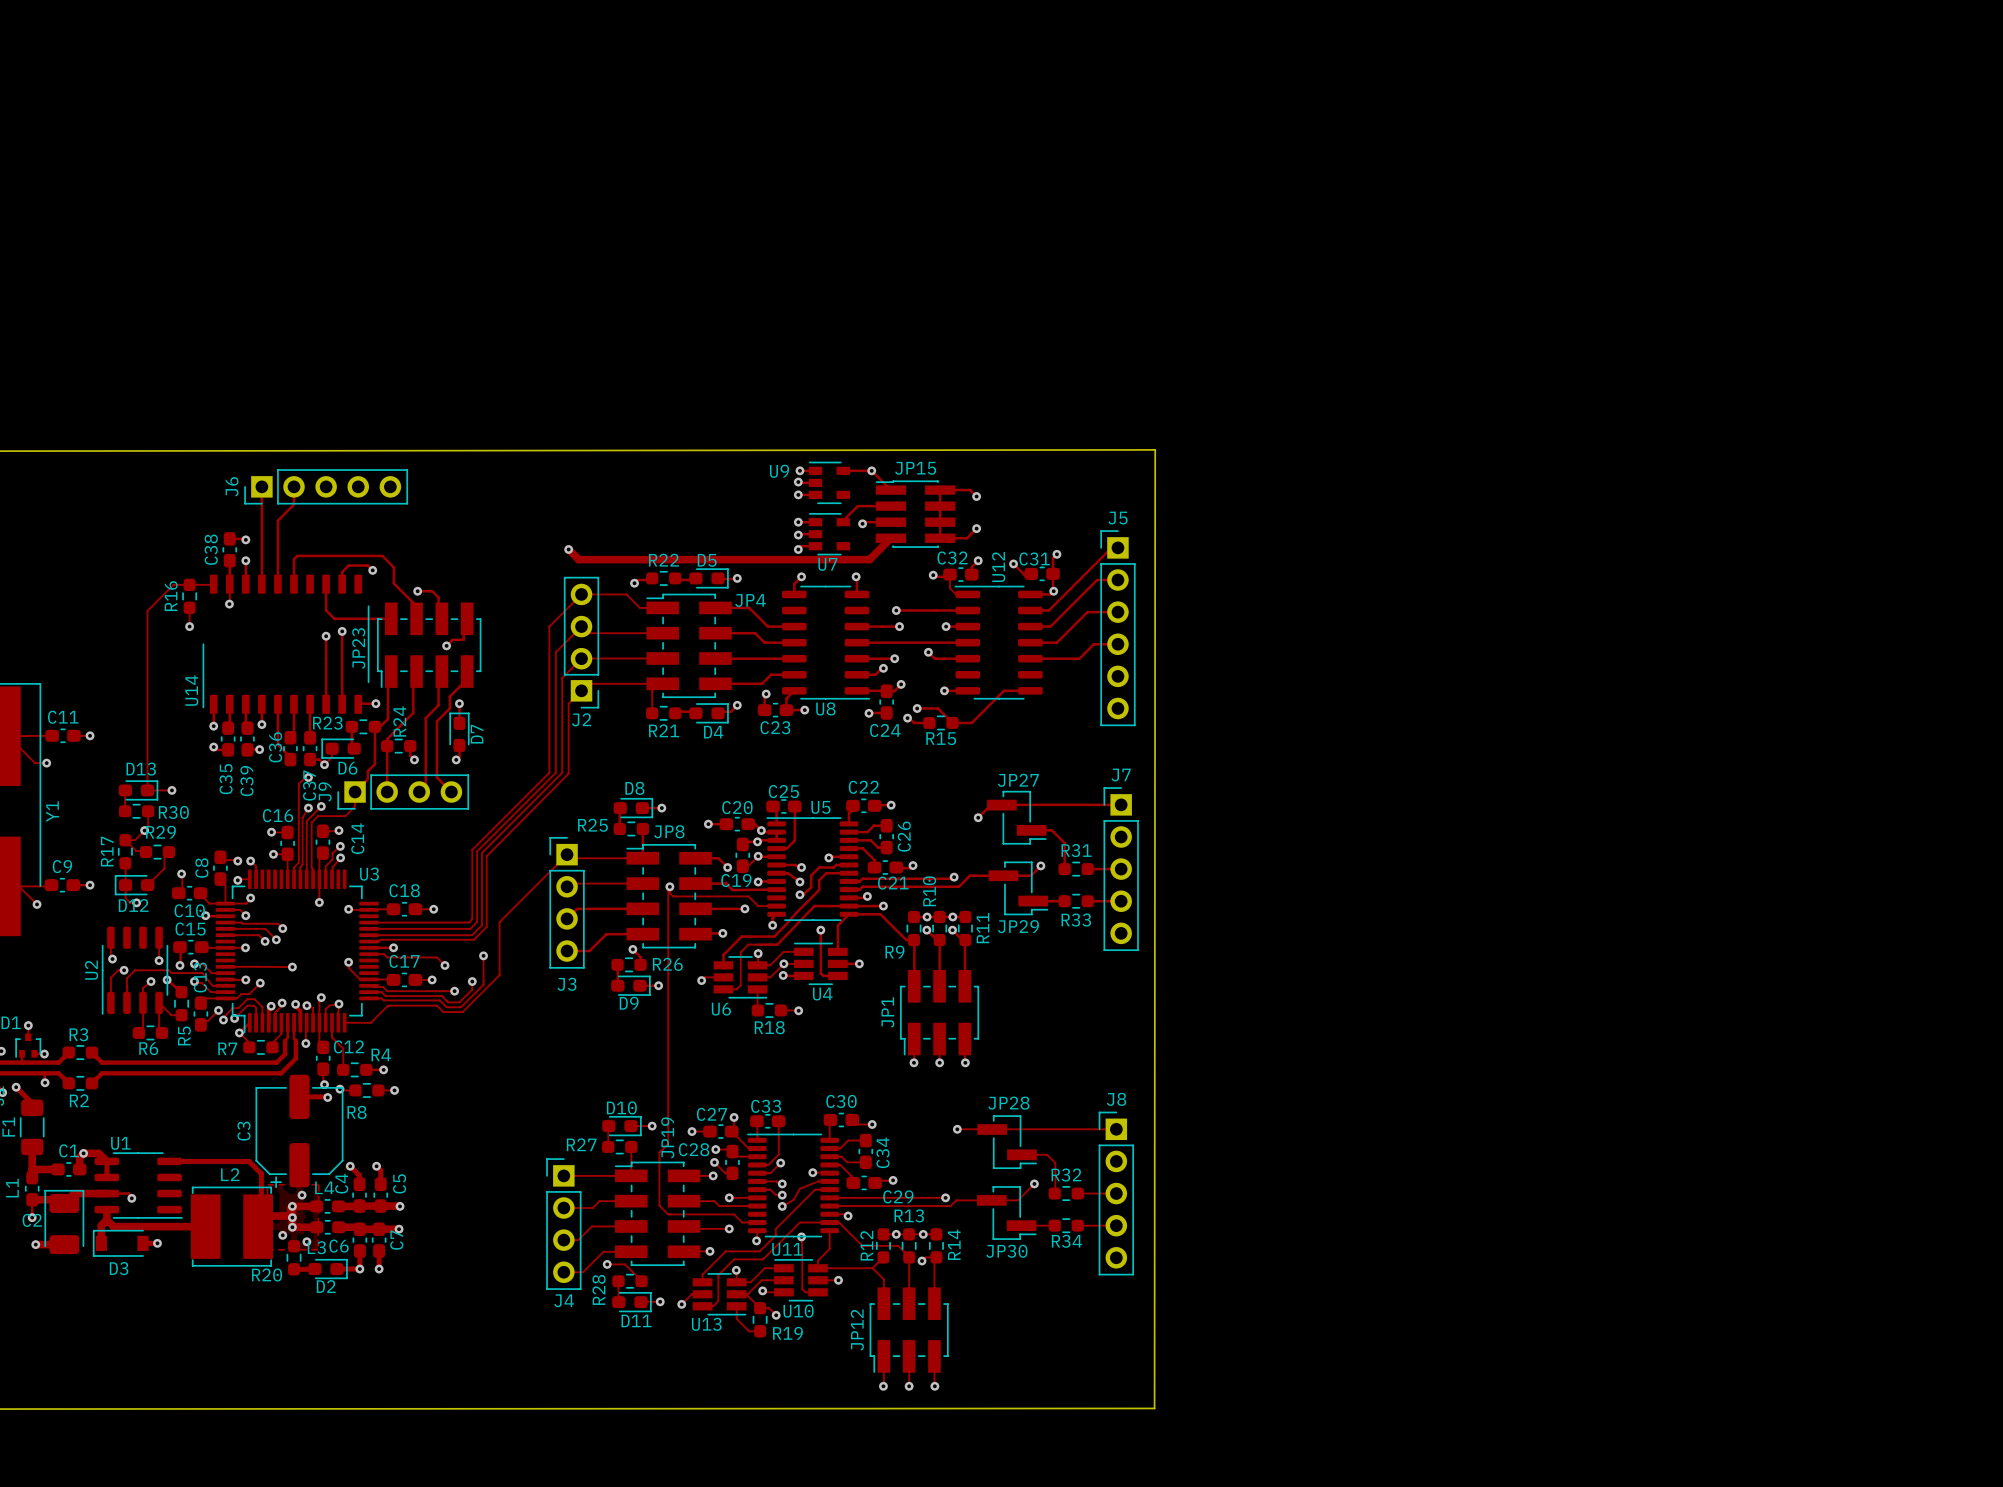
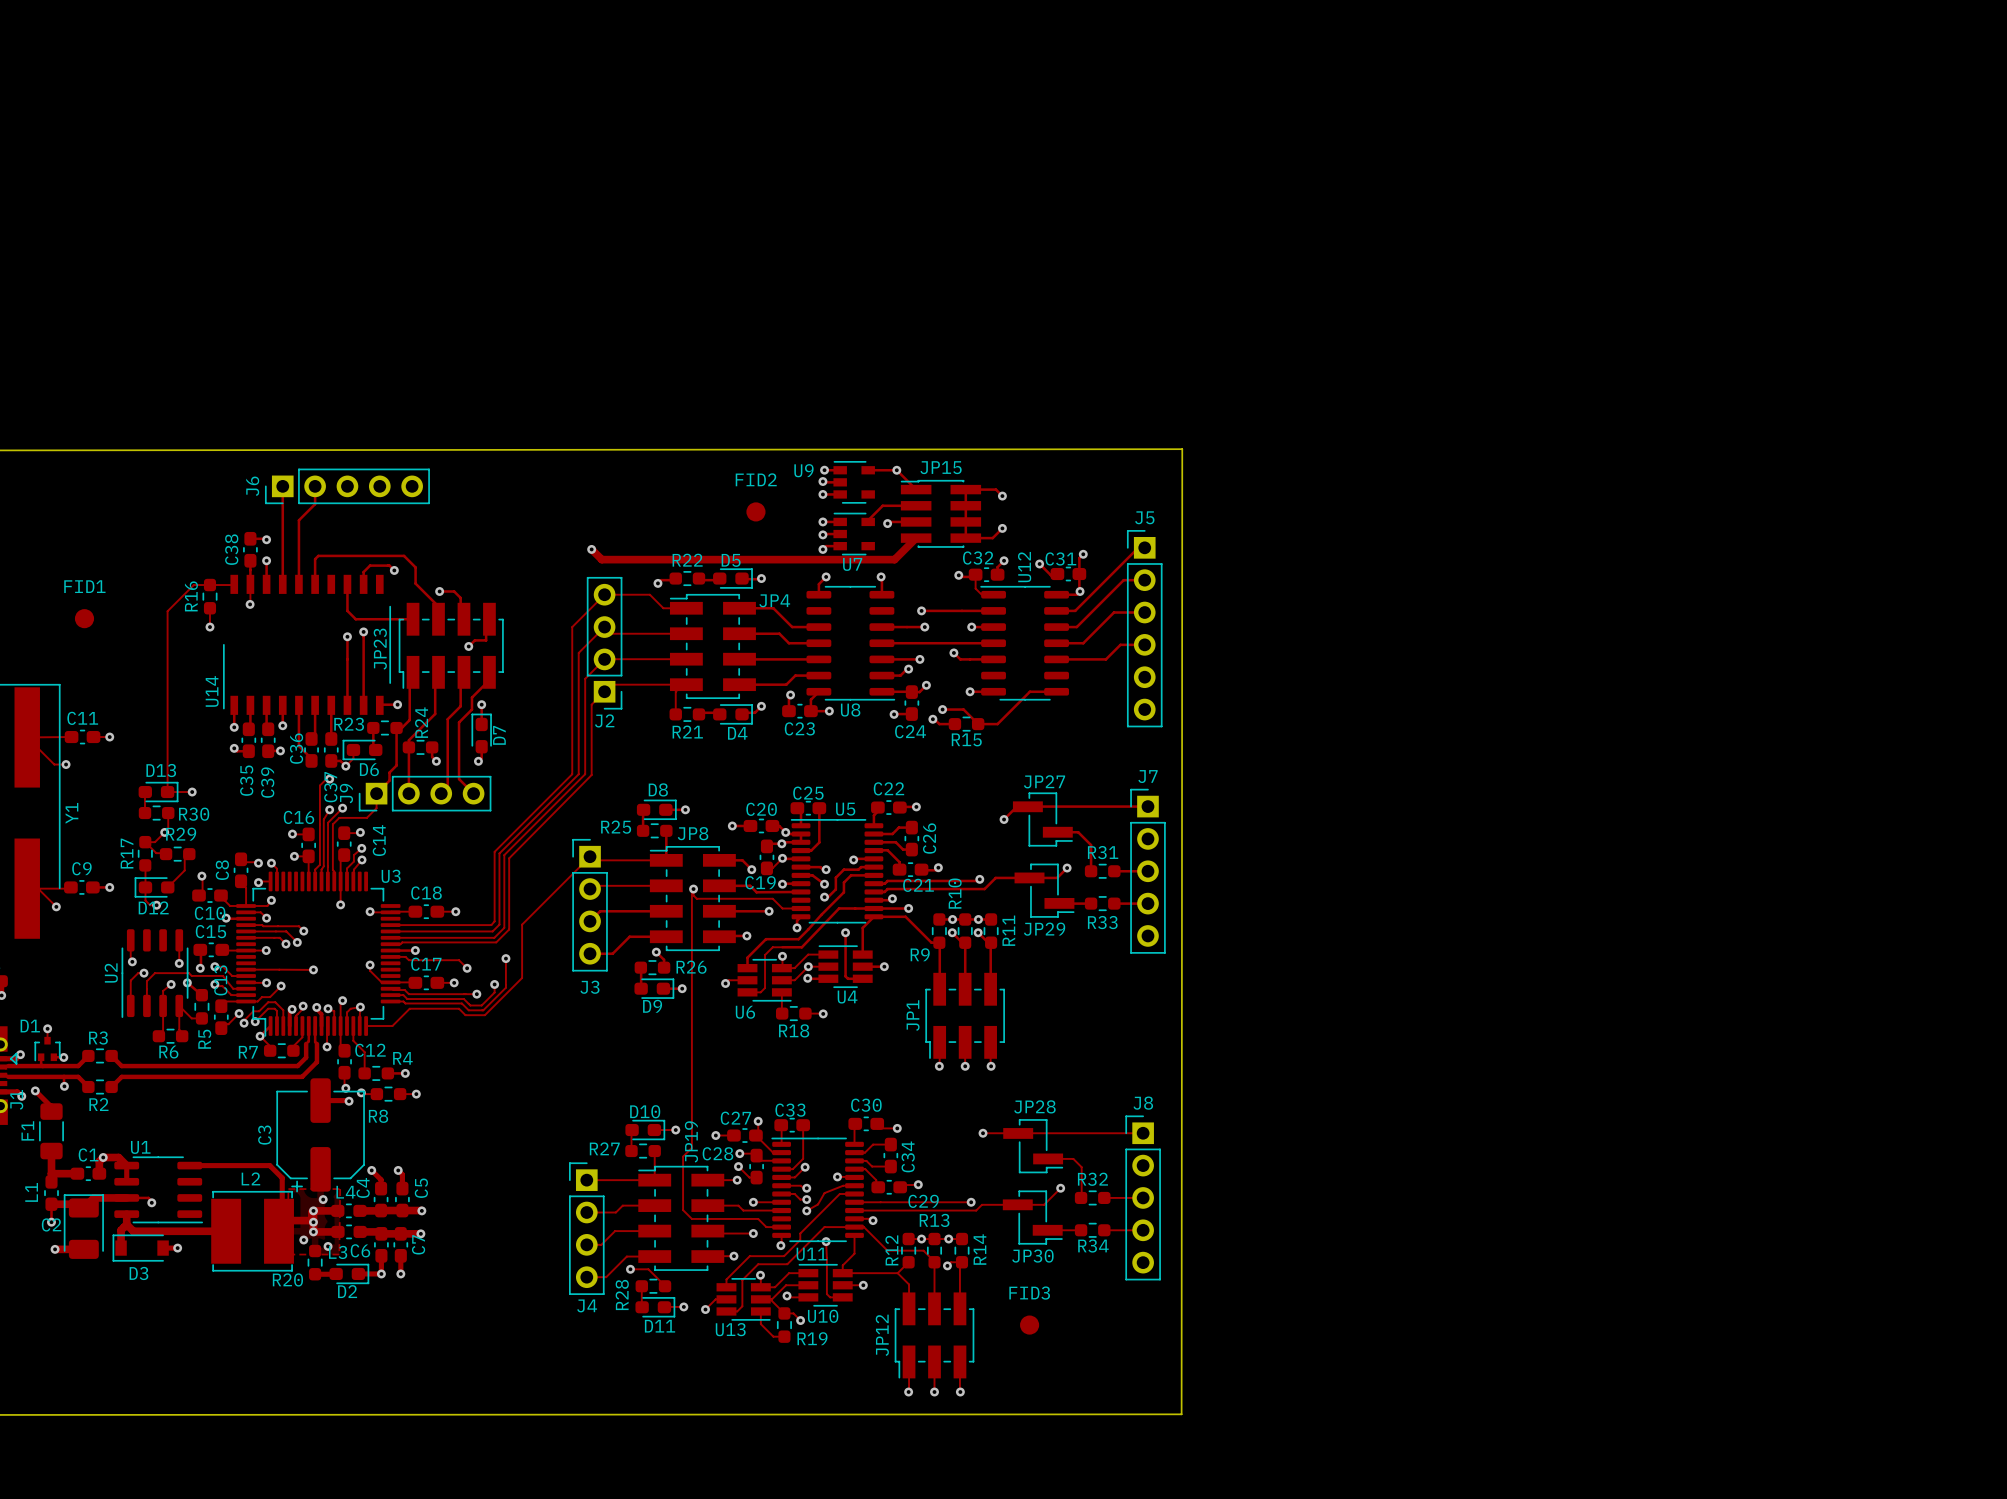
FID2: none -> (755, 511)
FID1: none -> (84, 618)
FID3: none -> (1029, 1325)

